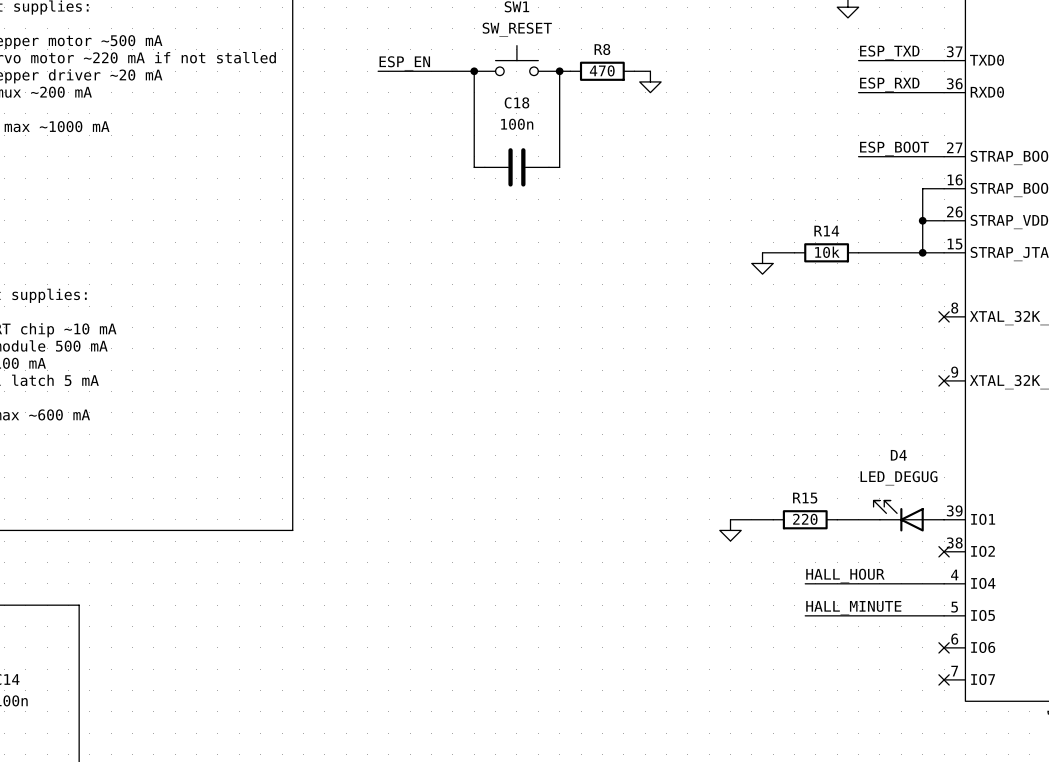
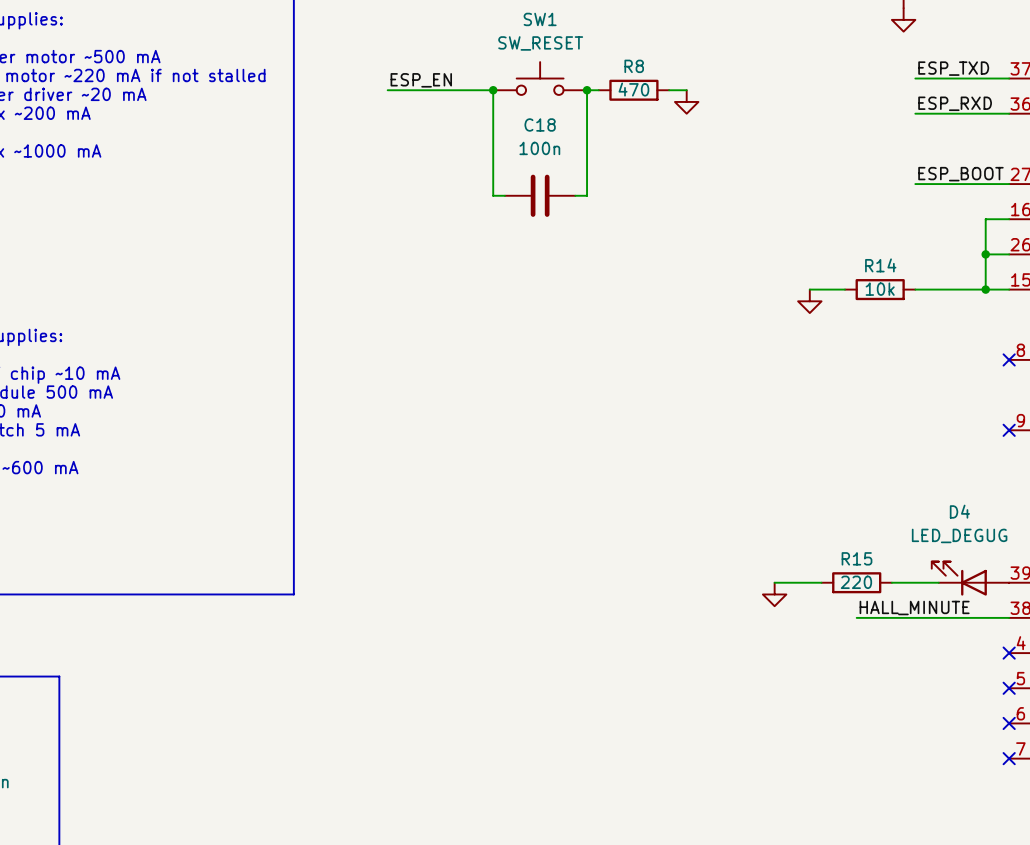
no-connect mark: (944, 551) -> none
label: HALL_HOUR (845, 575) -> none
wire: (805, 583) (944, 583) -> (856, 617) (1009, 617)
no-connect mark: none -> (1009, 653)
label position: HALL_MINUTE (853, 608) -> HALL_MINUTE (914, 608)
wire: (805, 615) (944, 615) -> none
no-connect mark: none -> (1009, 688)

